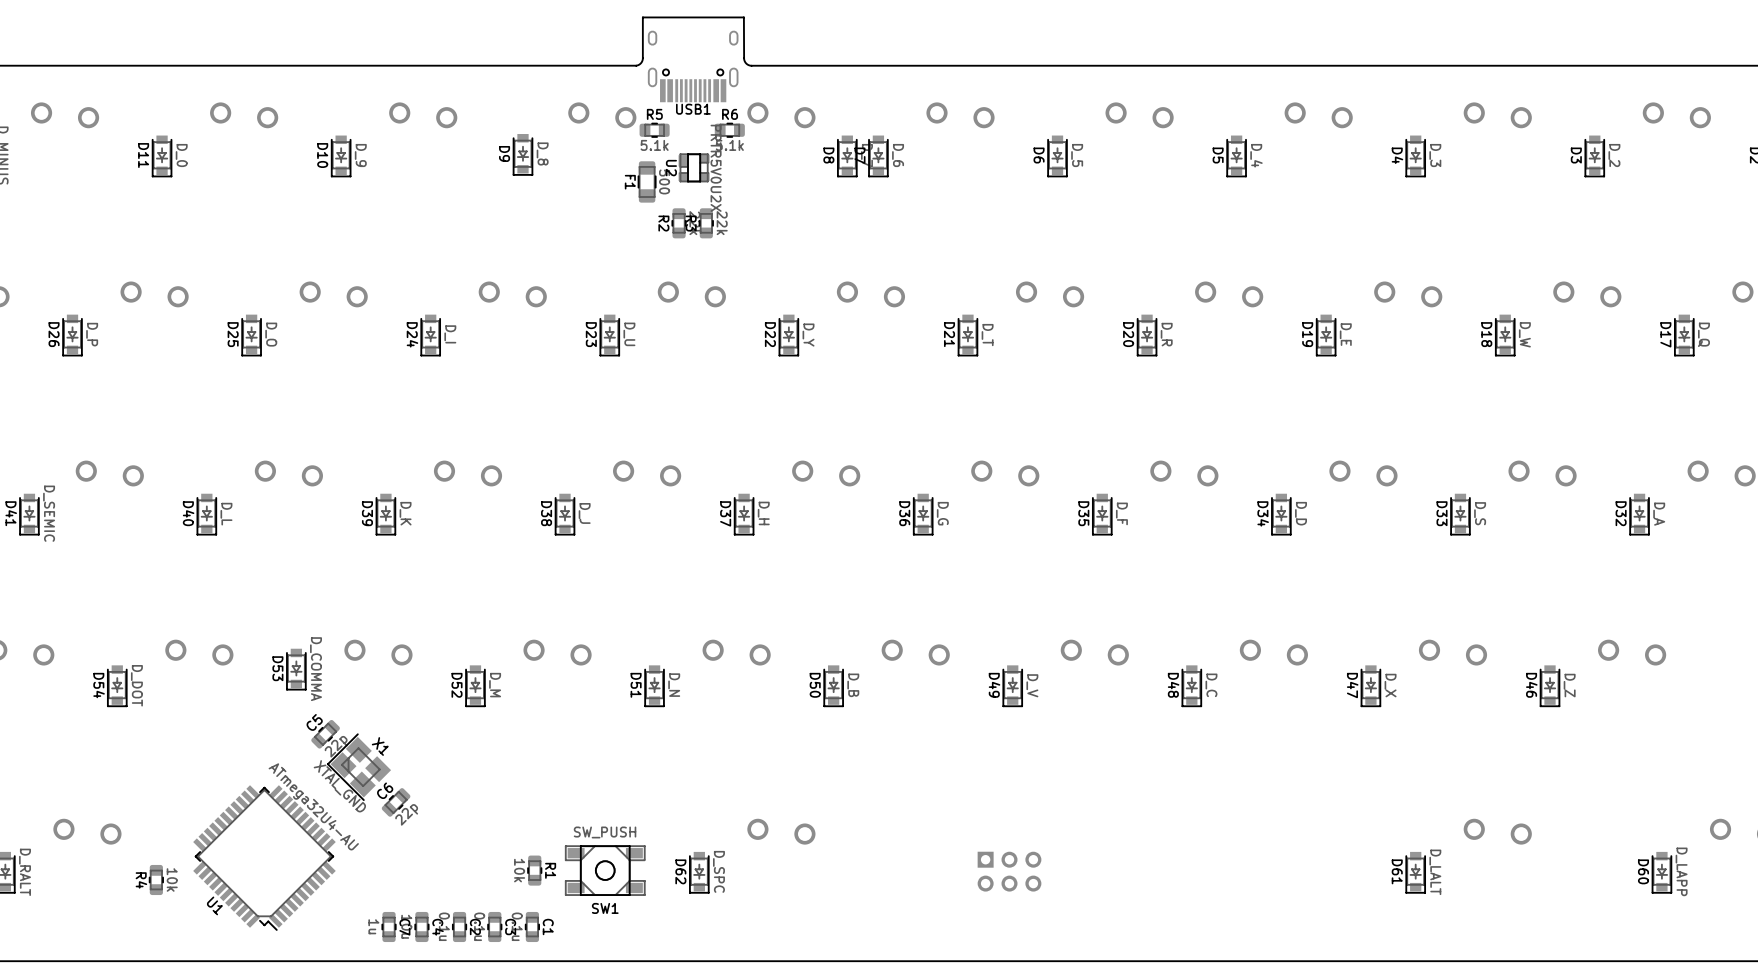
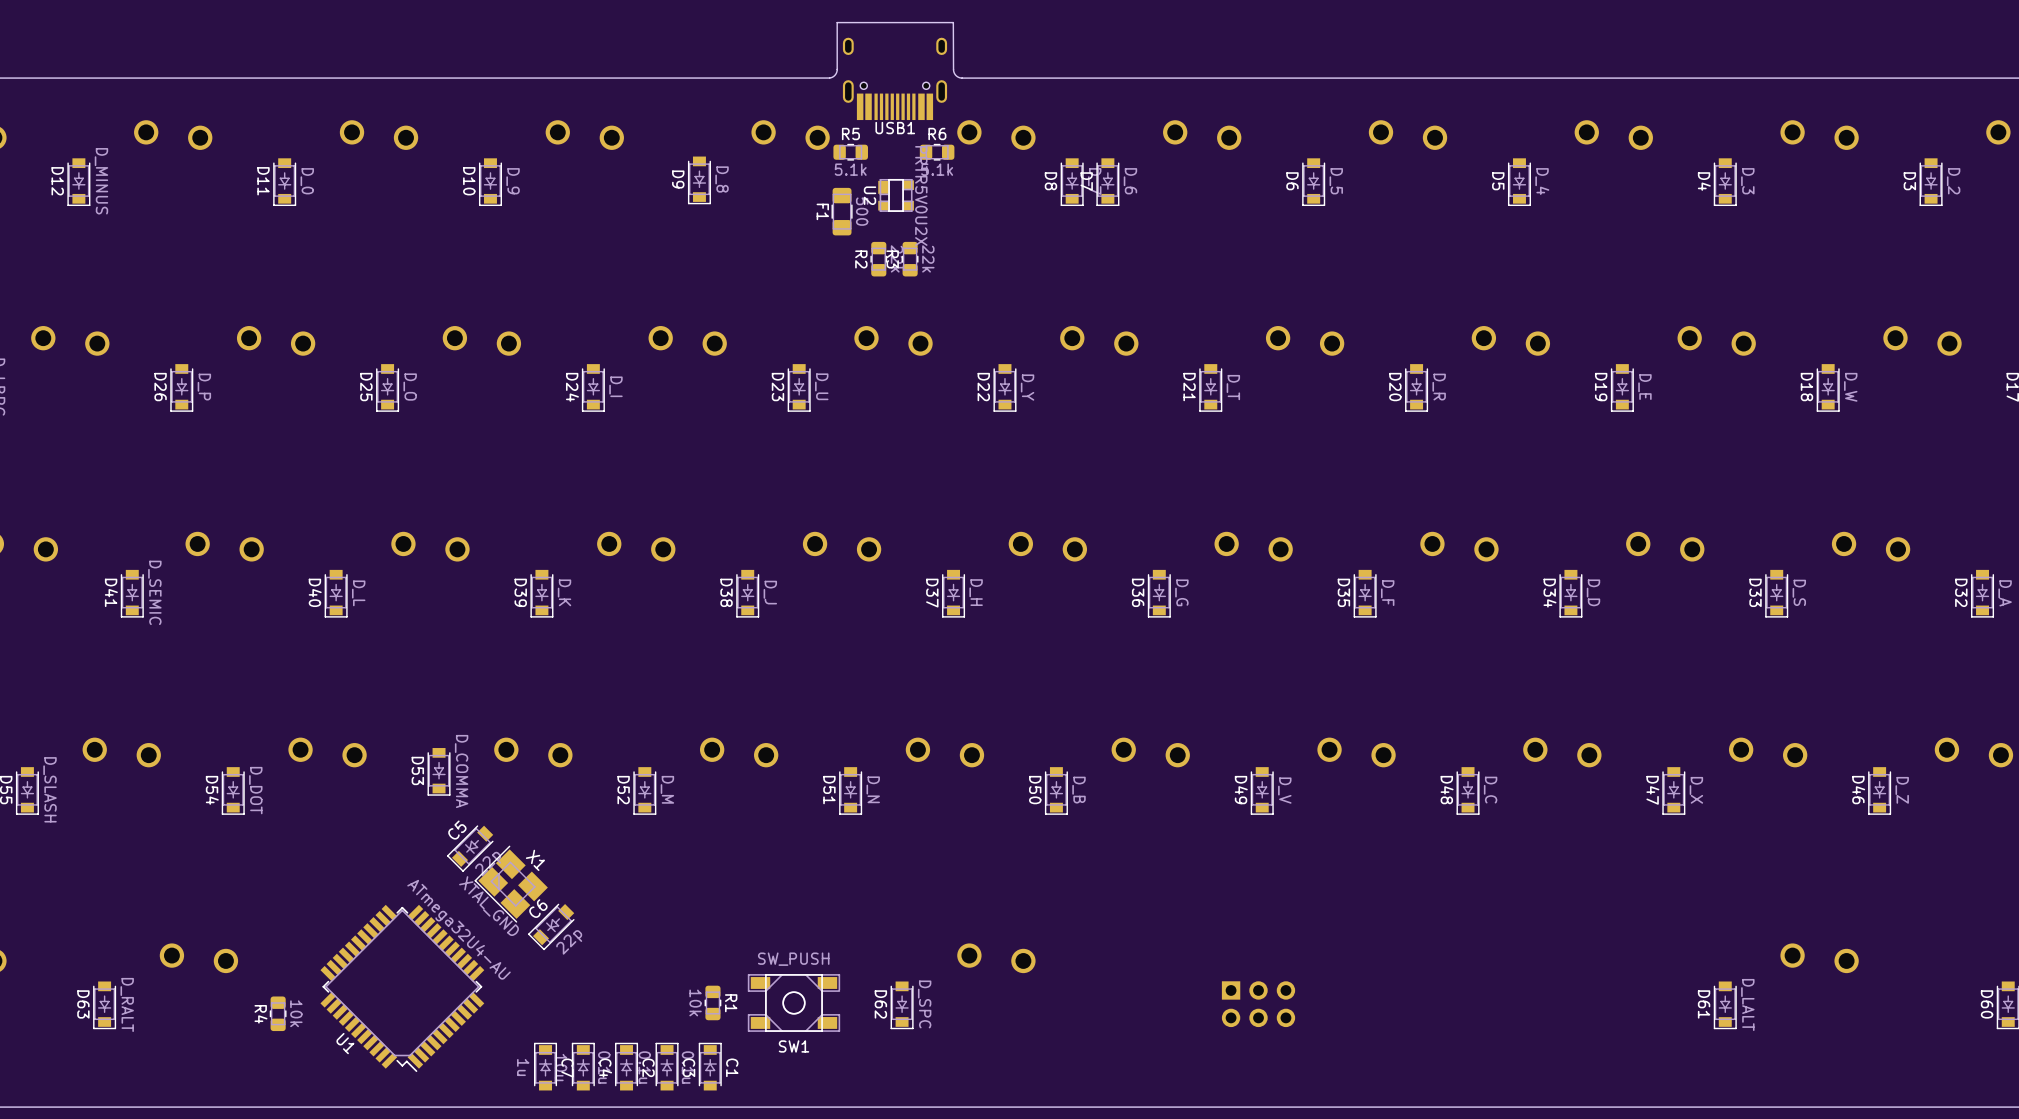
C5 footprint: [311, 719, 340, 749] -> [447, 825, 494, 872]
C6 footprint: [381, 788, 411, 817] -> [528, 903, 575, 951]
C7 footprint: [381, 911, 397, 943] -> [534, 1042, 557, 1091]
C4 footprint: [414, 911, 430, 943] -> [571, 1042, 595, 1091]
C2 footprint: [452, 911, 467, 943] -> [615, 1042, 638, 1091]
C3 footprint: [487, 911, 503, 943] -> [655, 1042, 679, 1091]
C1 footprint: [525, 911, 540, 943] -> [698, 1042, 722, 1091]

